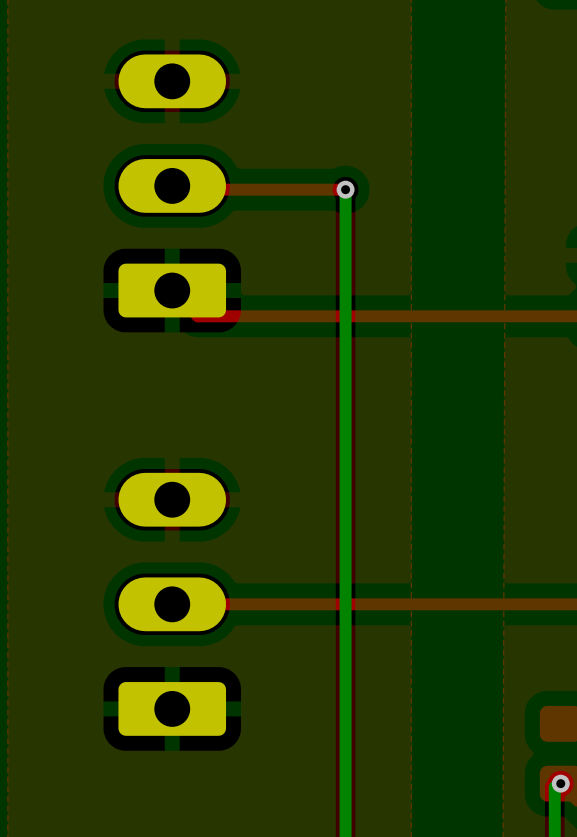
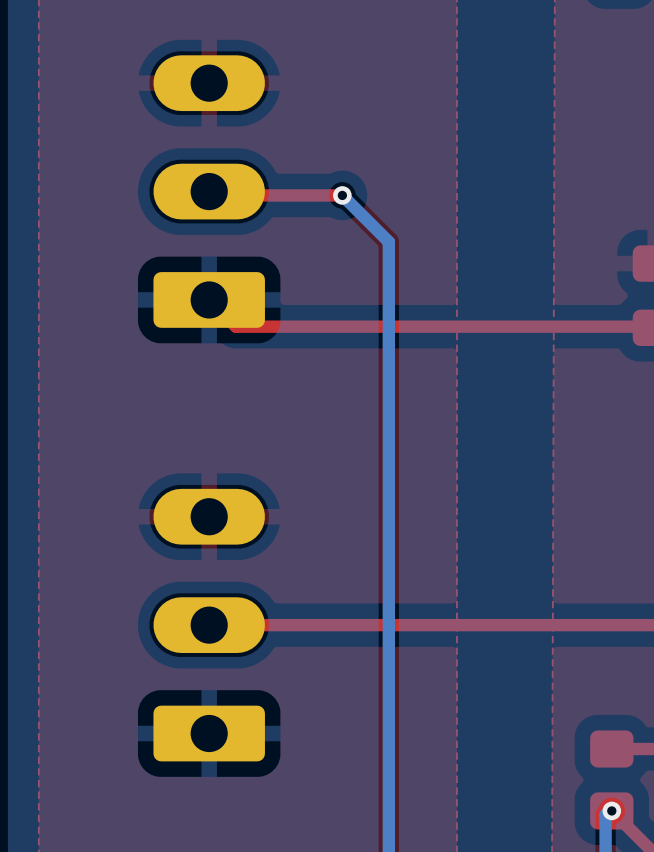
top track: (345, 189) (300, 189) -> none
bottom track: (345, 189) (345, 234) -> (342, 195) (388, 241)
via position: (345, 189) -> (342, 195)

